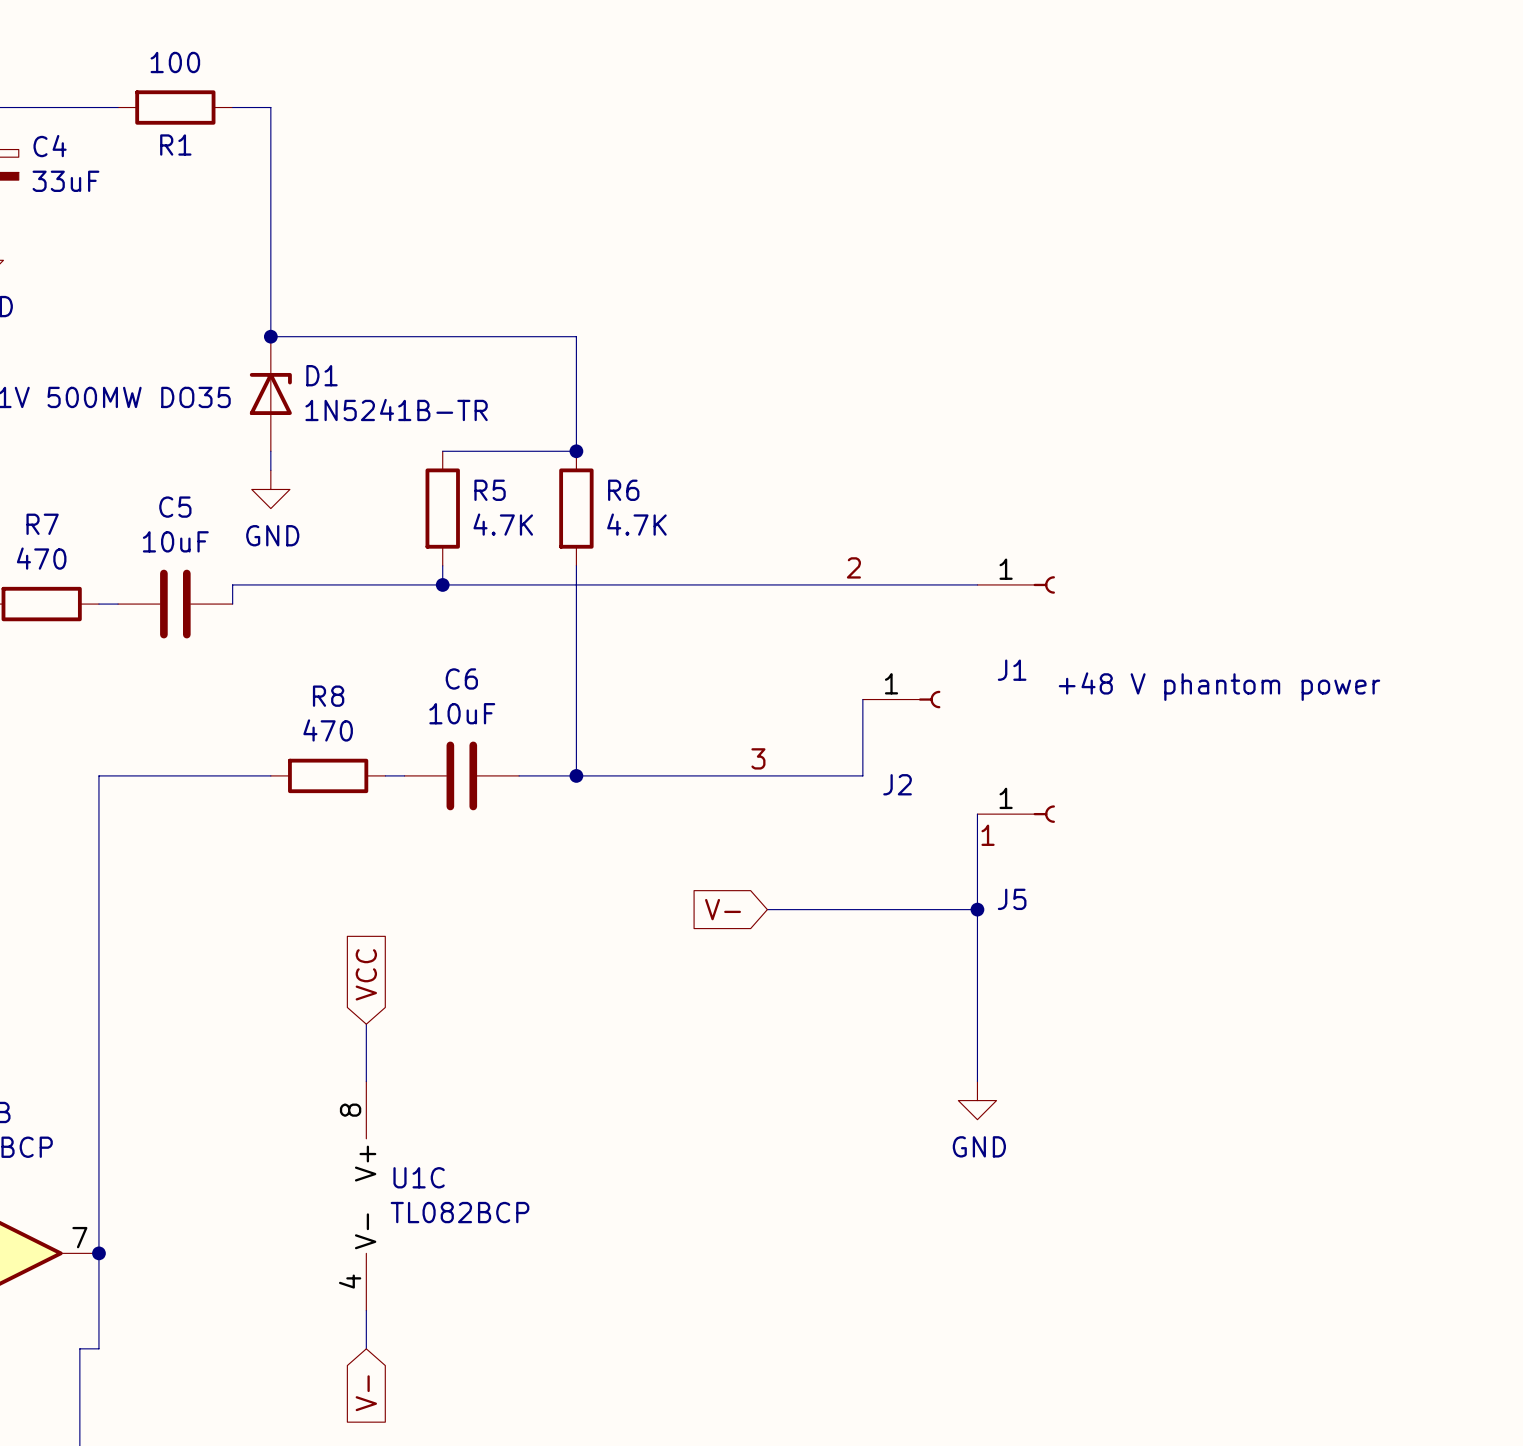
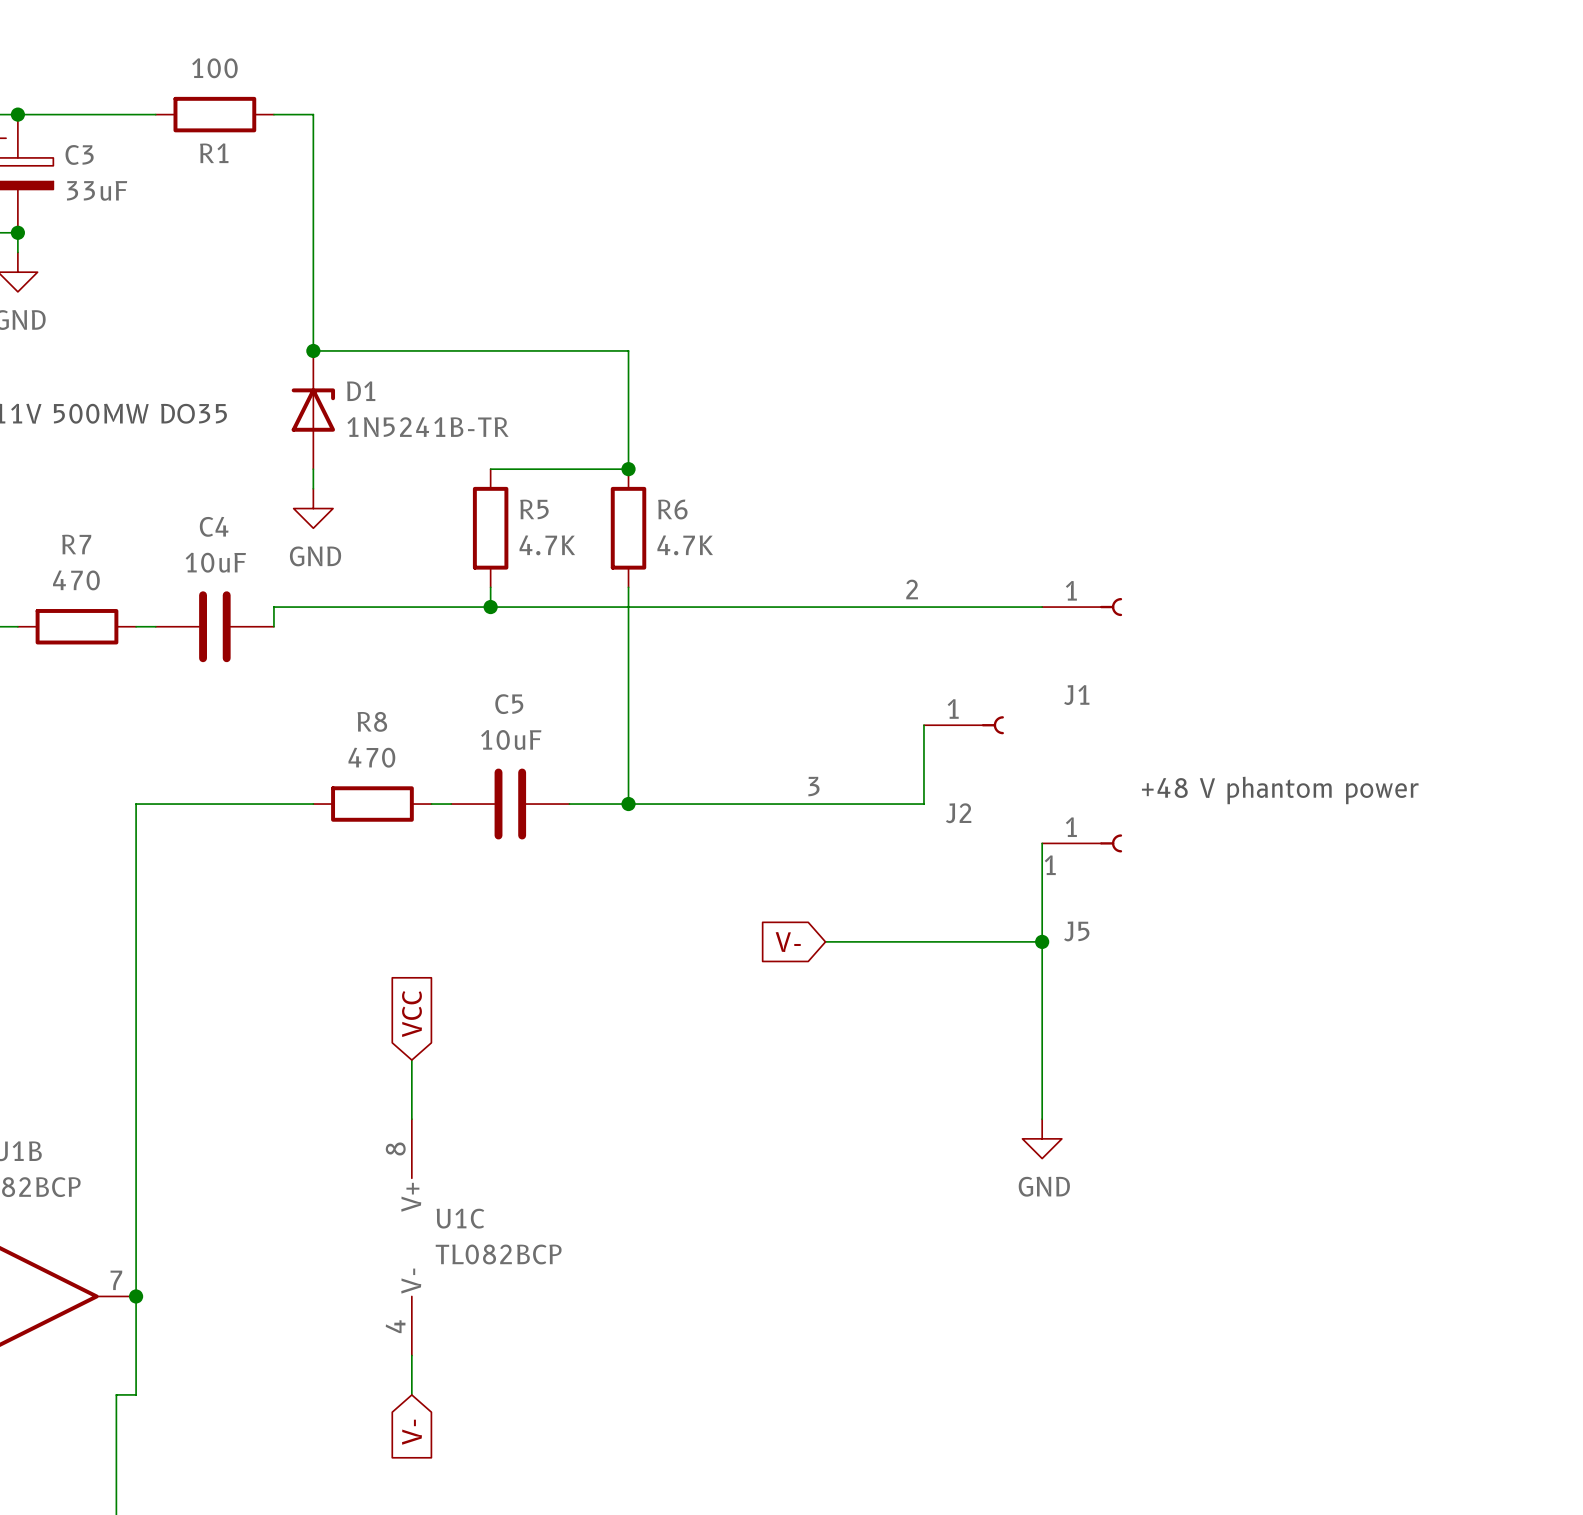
C4 name: C4 (50, 146) -> C3 (79, 154)
C5 name: C5 (175, 507) -> C4 (214, 526)
C6 name: C6 (461, 678) -> C5 (509, 704)
text position: +48 V phantom power (1219, 686) -> +48 V phantom power (1280, 790)

